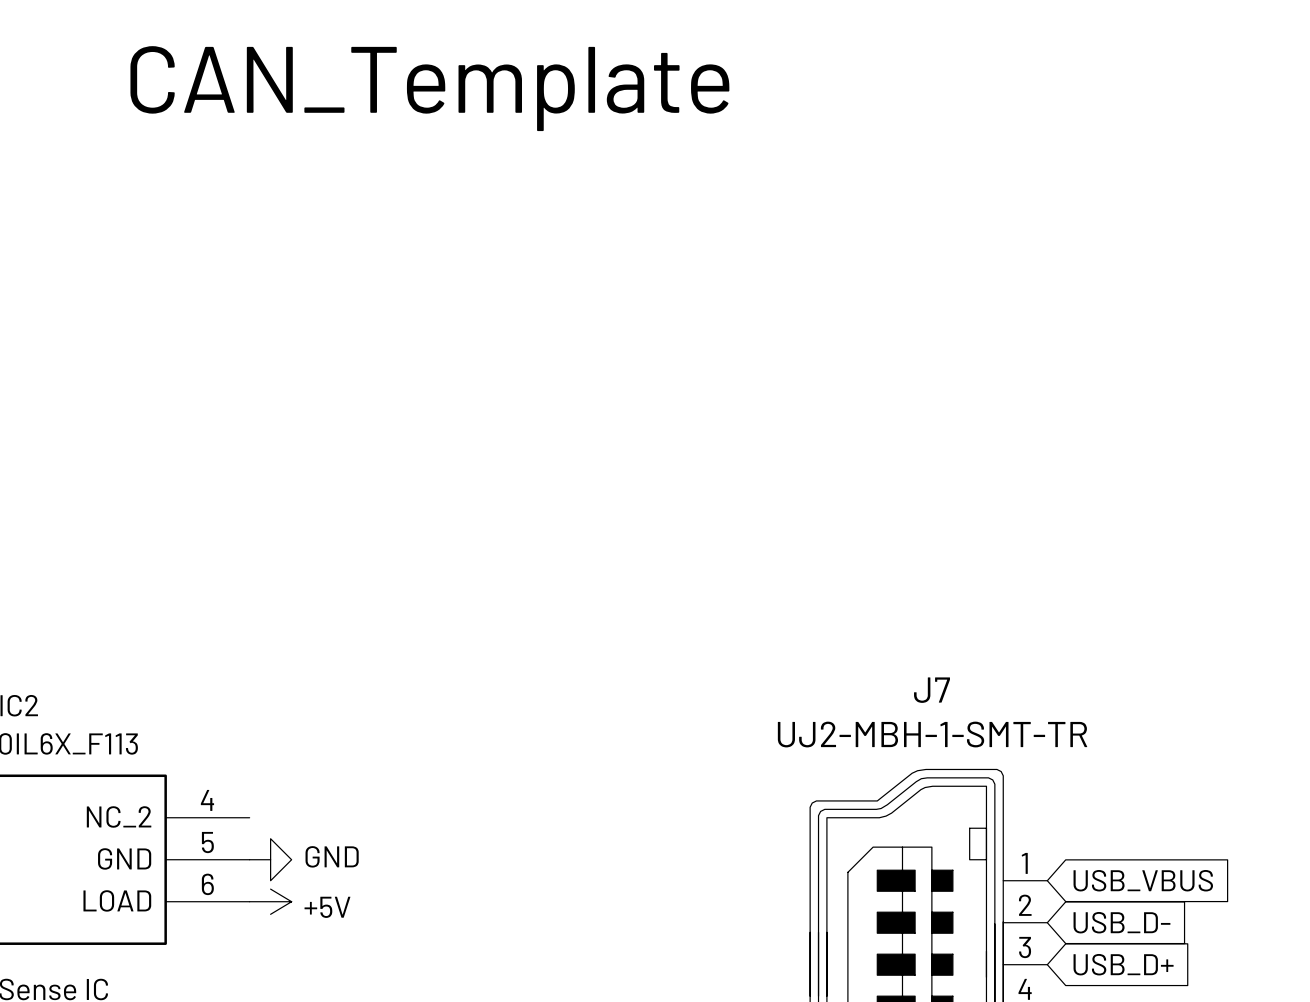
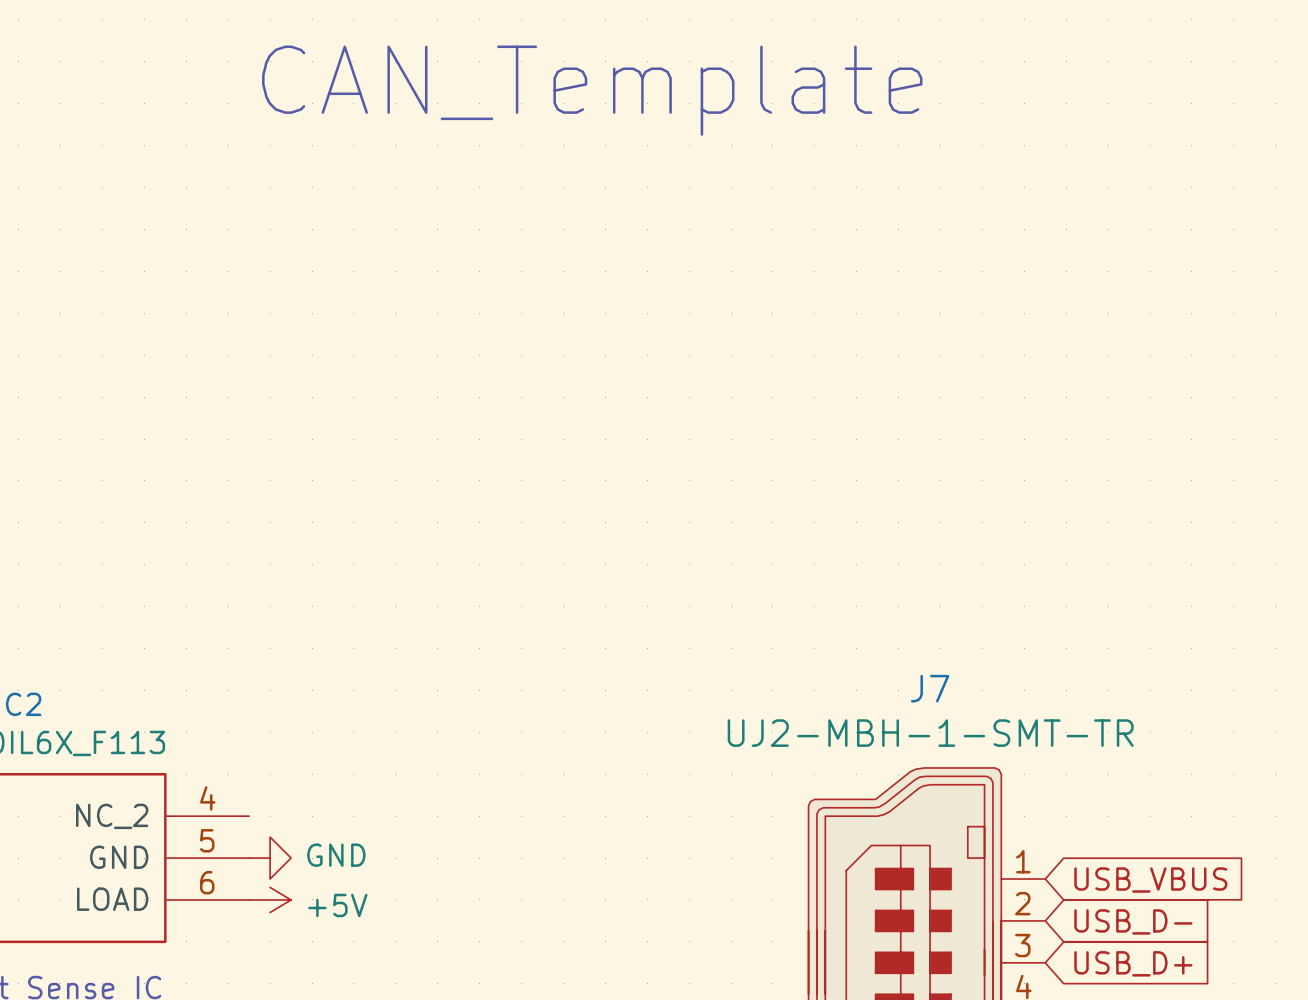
text position: CAN_Template (429, 88) -> CAN_Template (592, 90)

